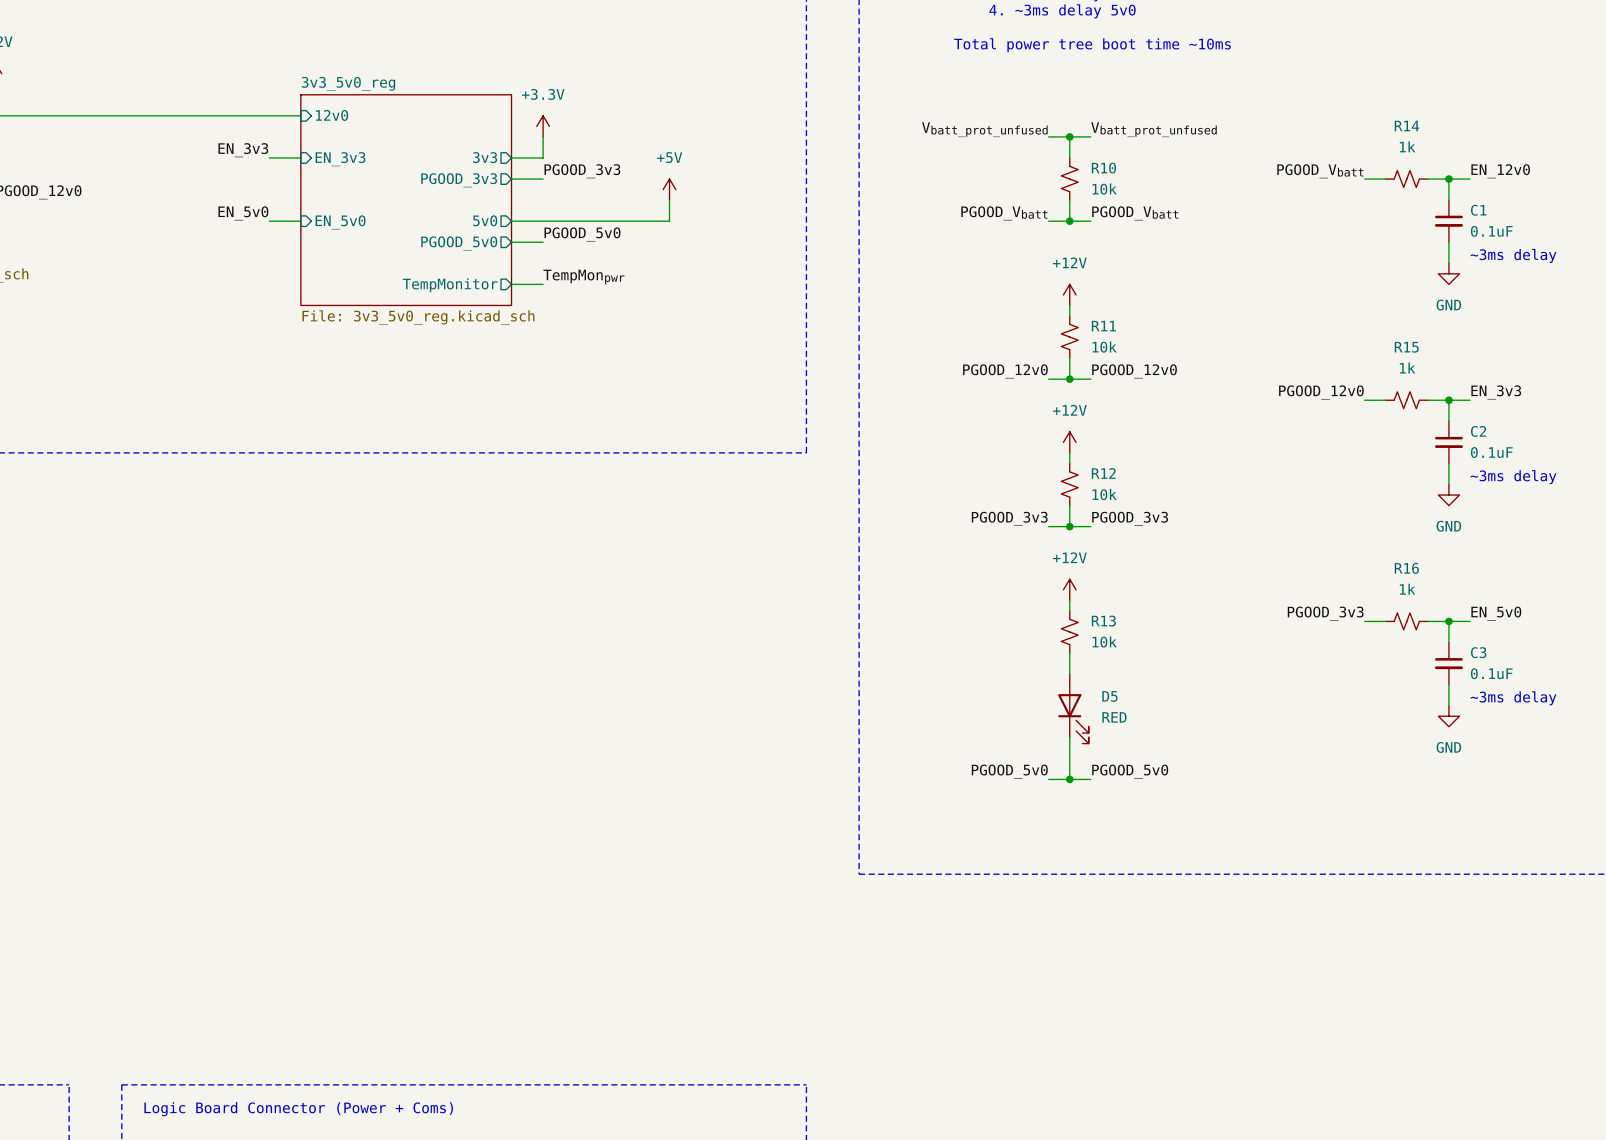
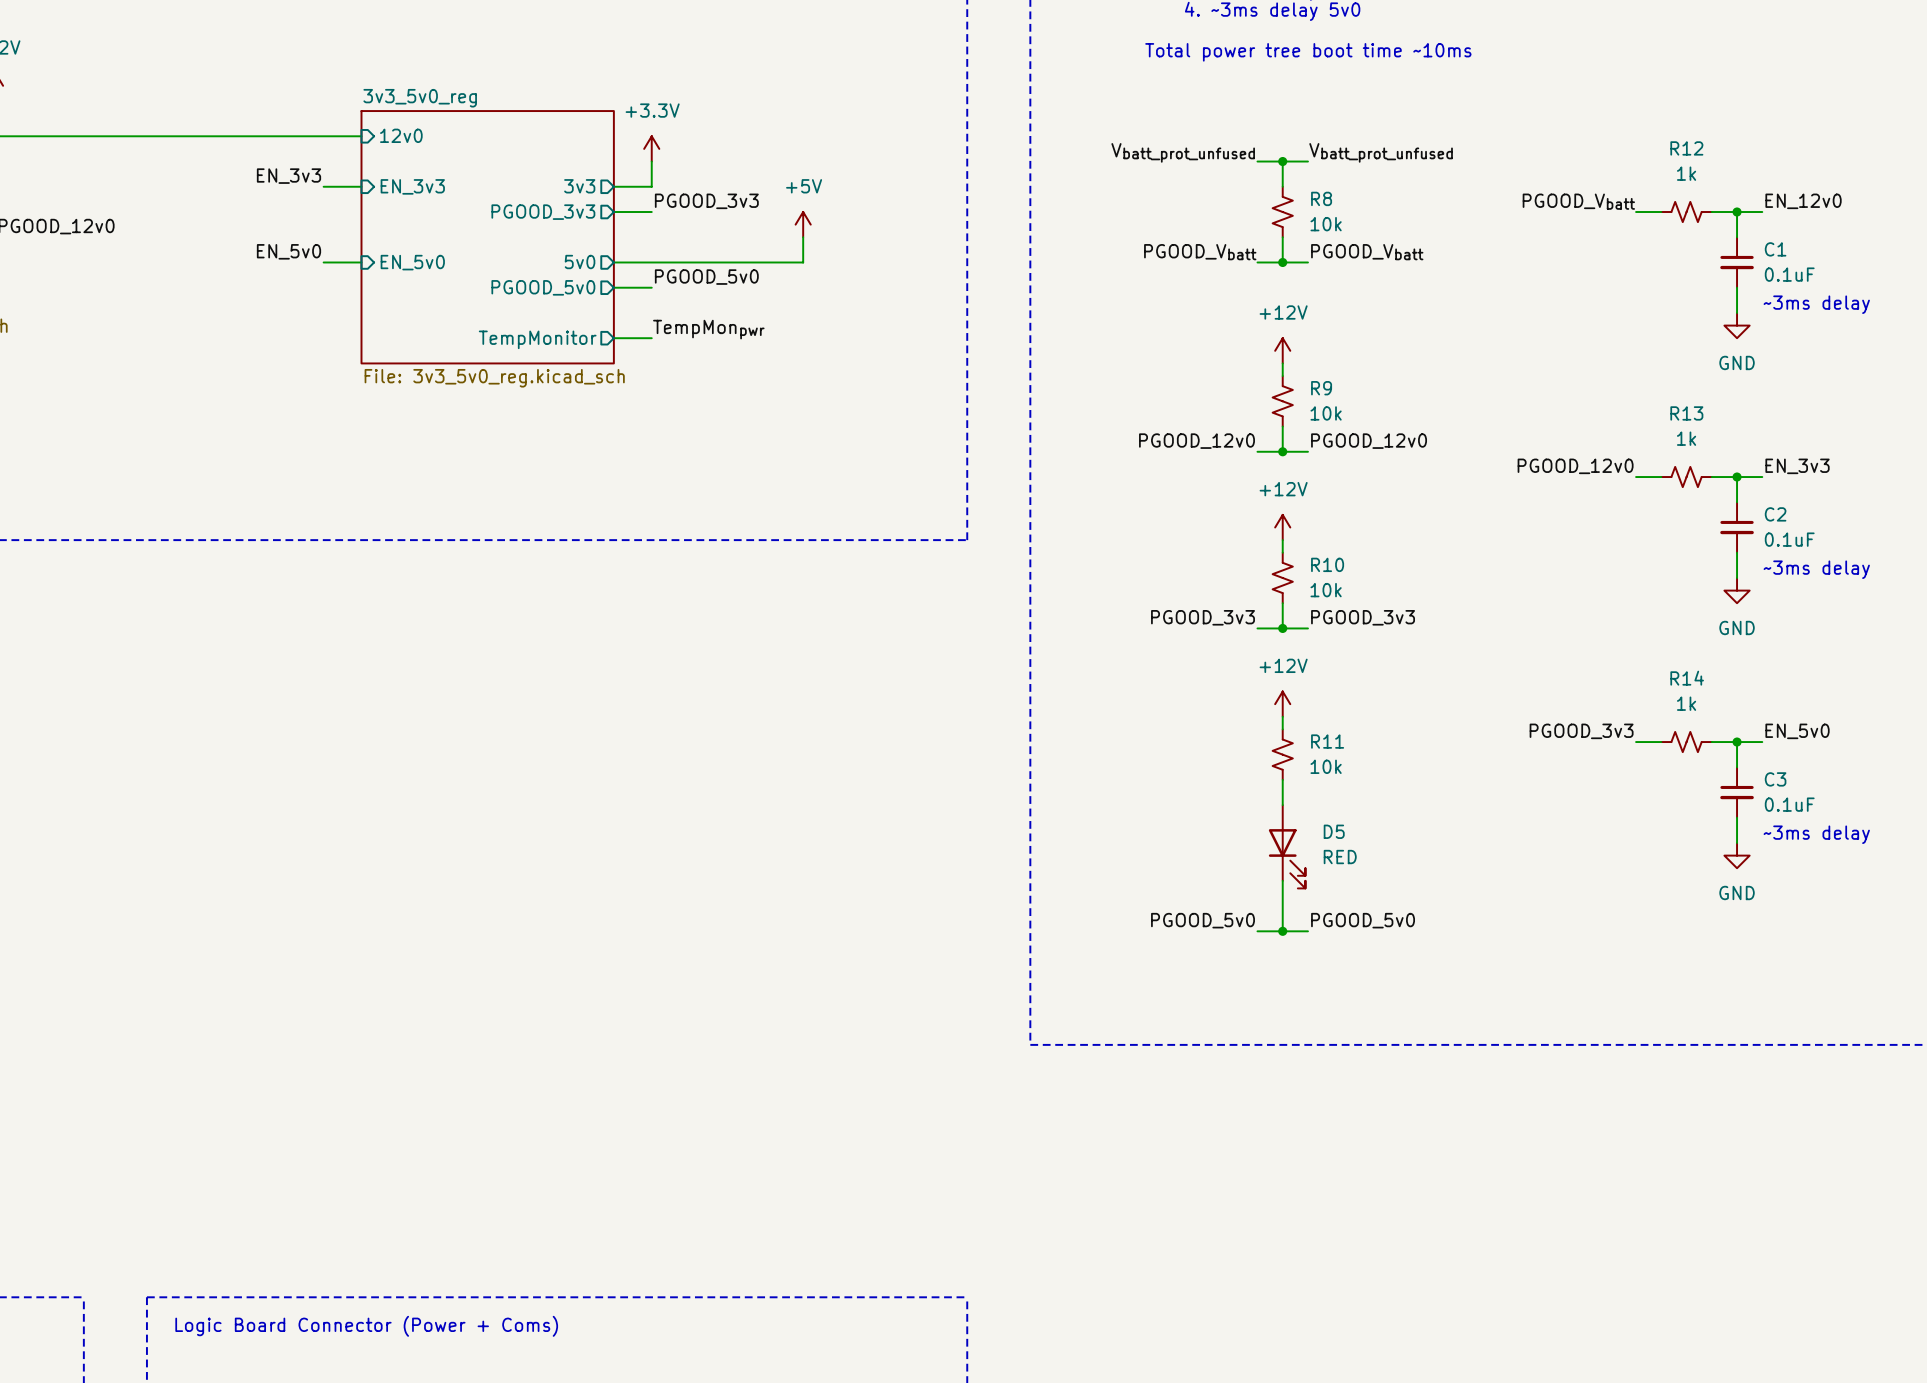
R14 name: R14 (1406, 125) -> R12 (1686, 148)
R10 name: R10 (1103, 168) -> R8 (1321, 198)
R11 name: R11 (1103, 326) -> R9 (1321, 388)
R15 name: R15 (1406, 347) -> R13 (1686, 413)
R12 name: R12 (1103, 473) -> R10 (1327, 564)
R16 name: R16 (1406, 568) -> R14 (1687, 678)
R13 name: R13 (1103, 621) -> R11 (1327, 741)

